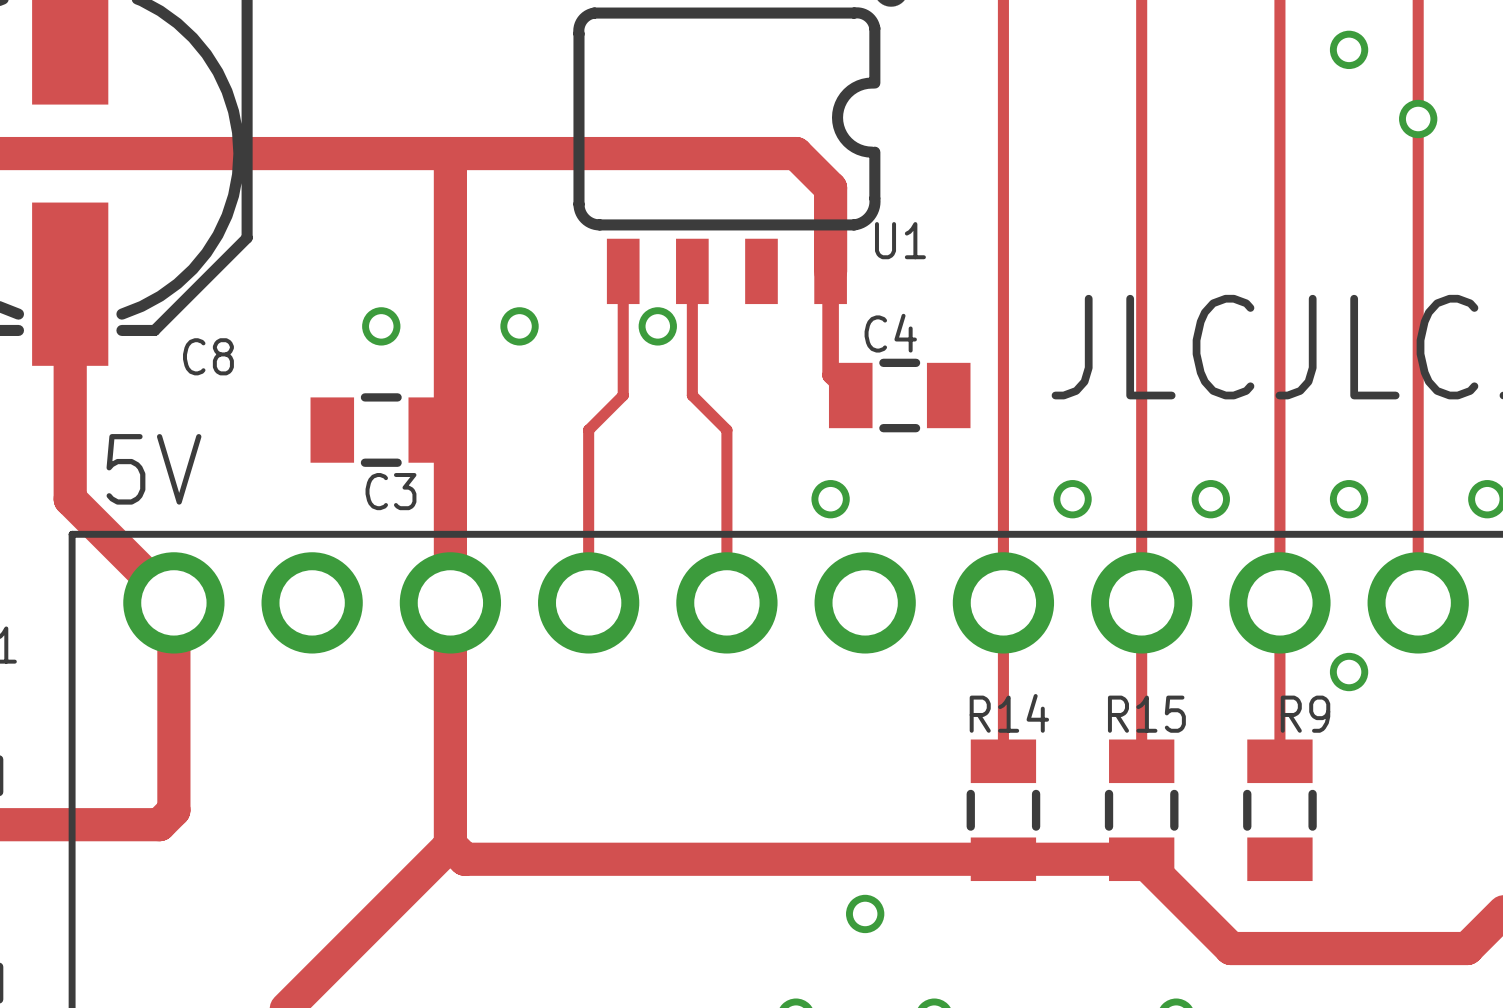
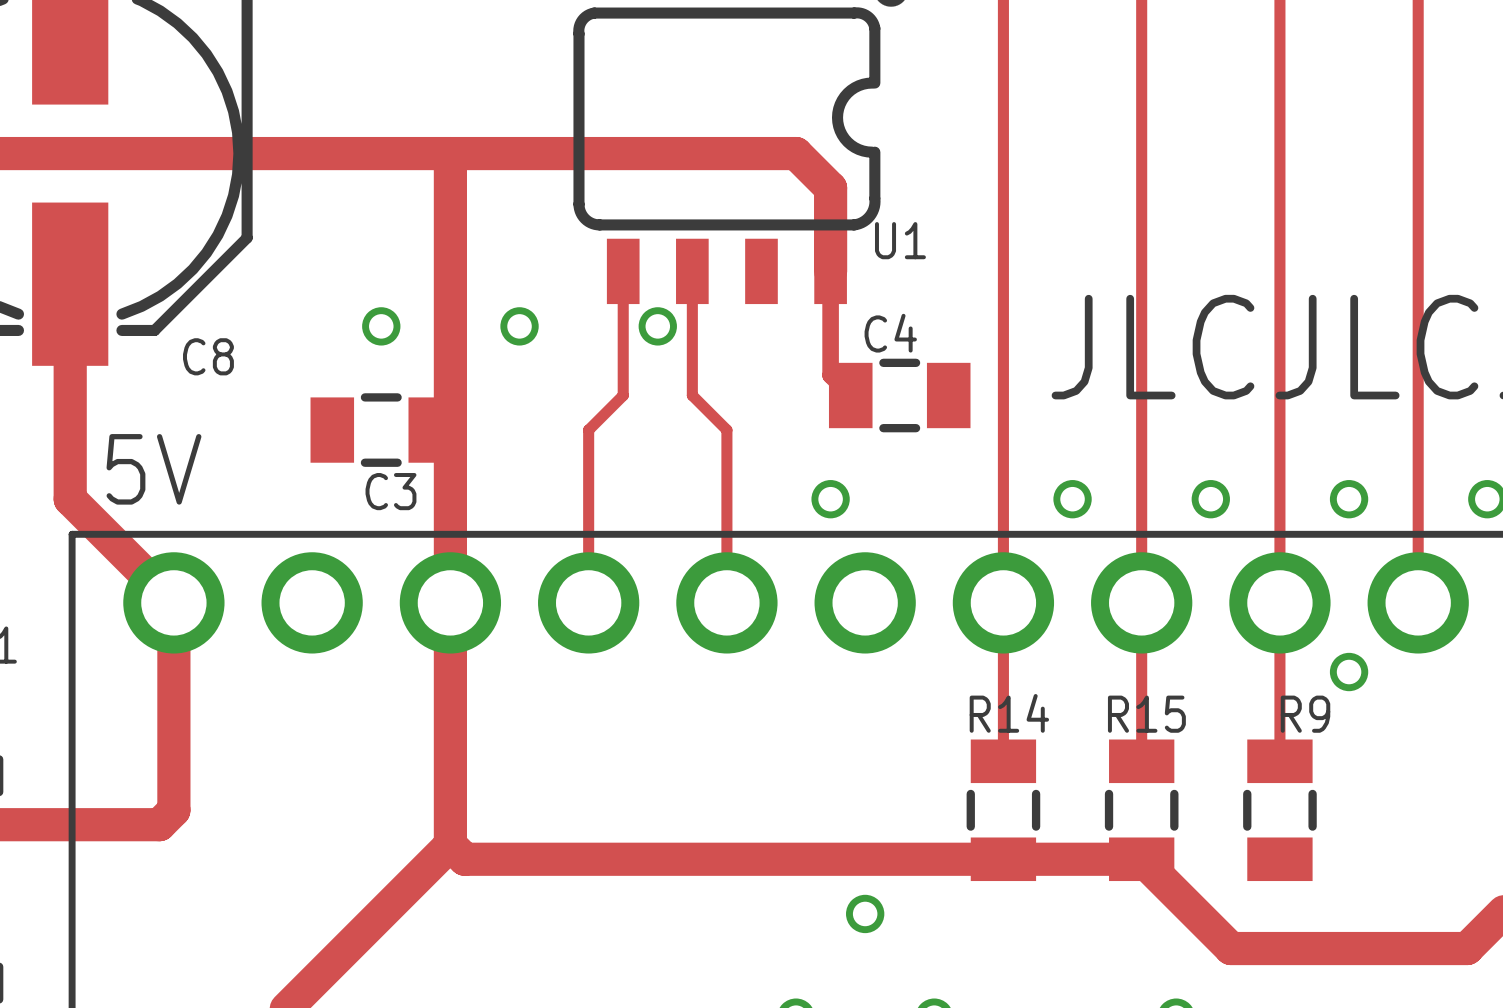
via: (1349, 49) -> none
via: (1418, 118) -> none

